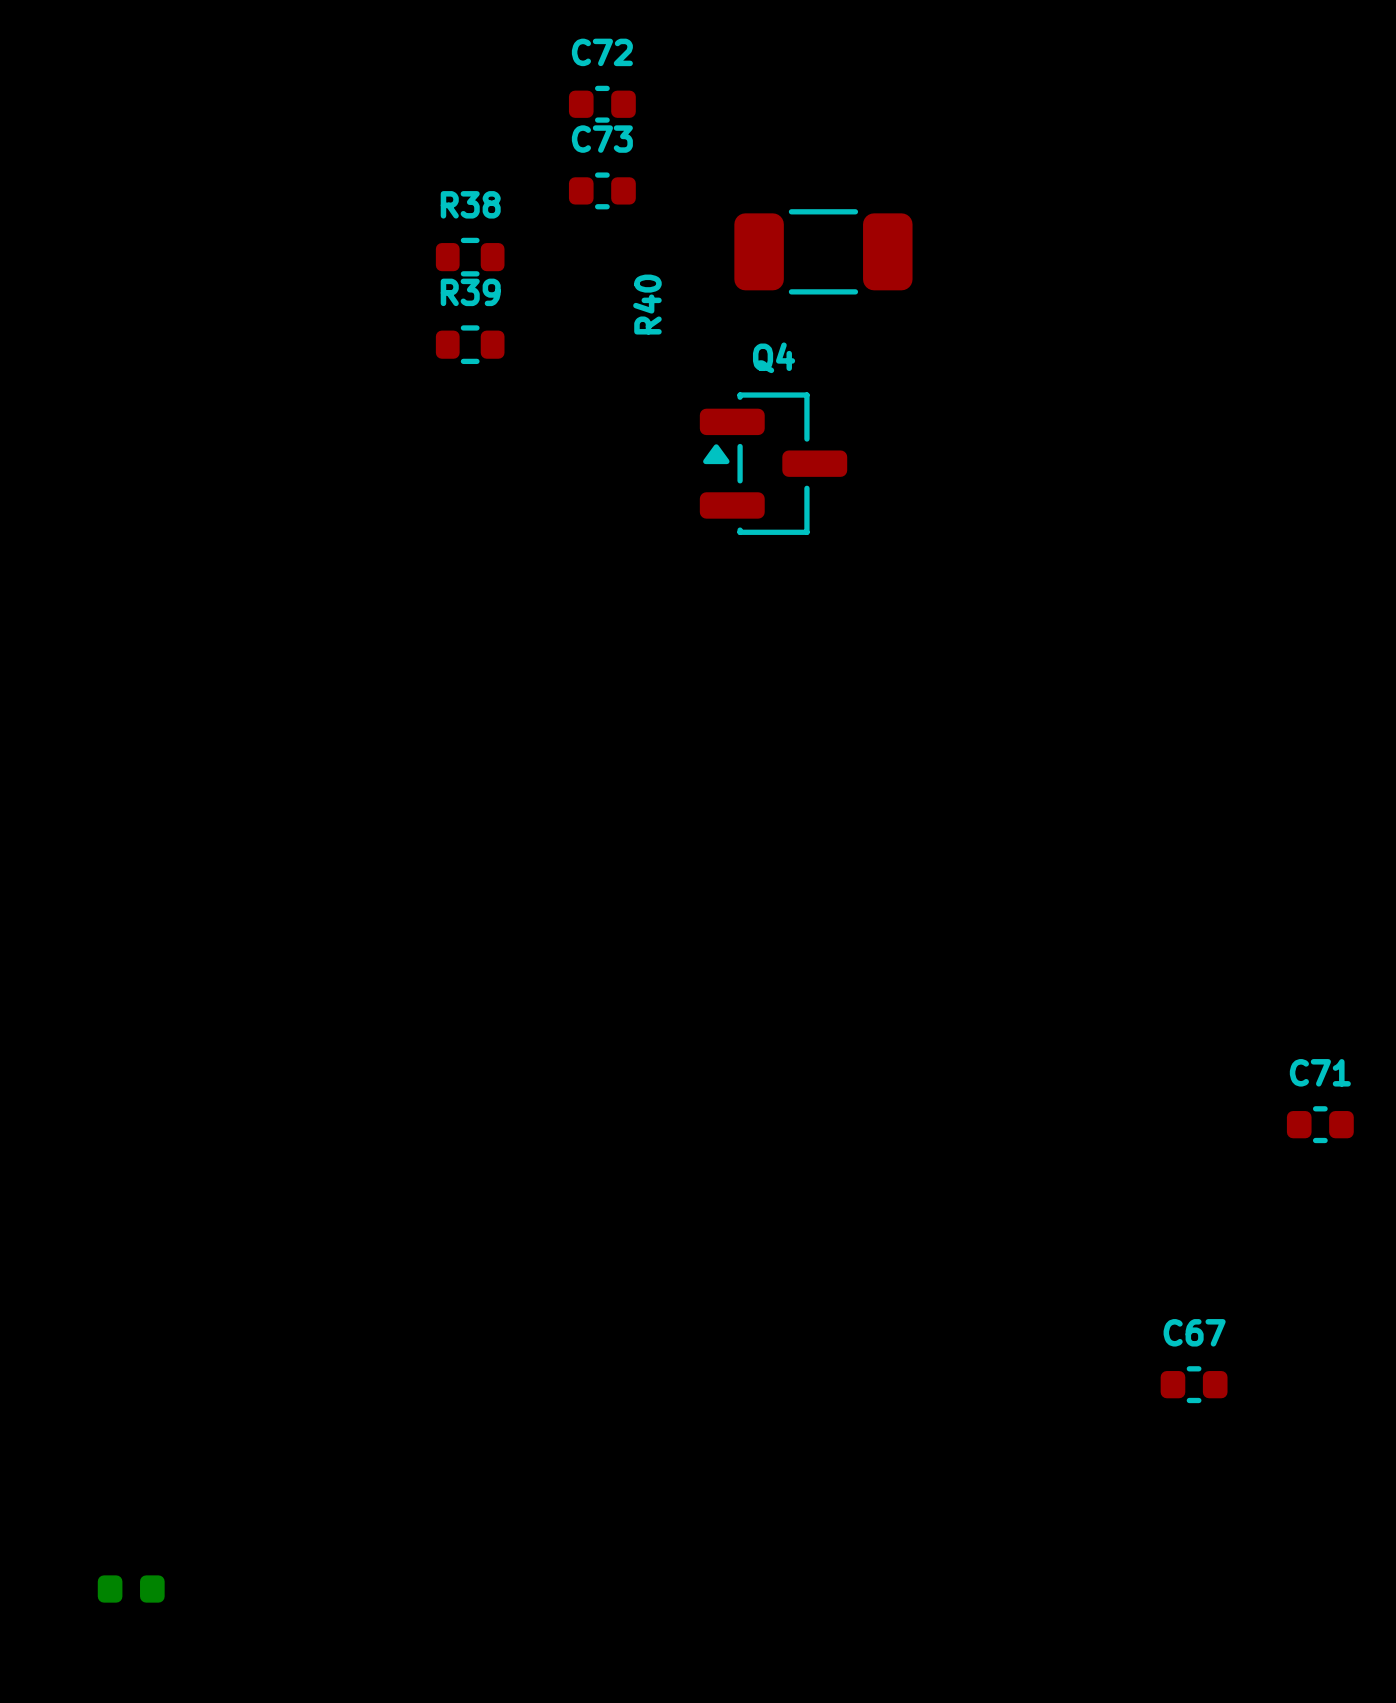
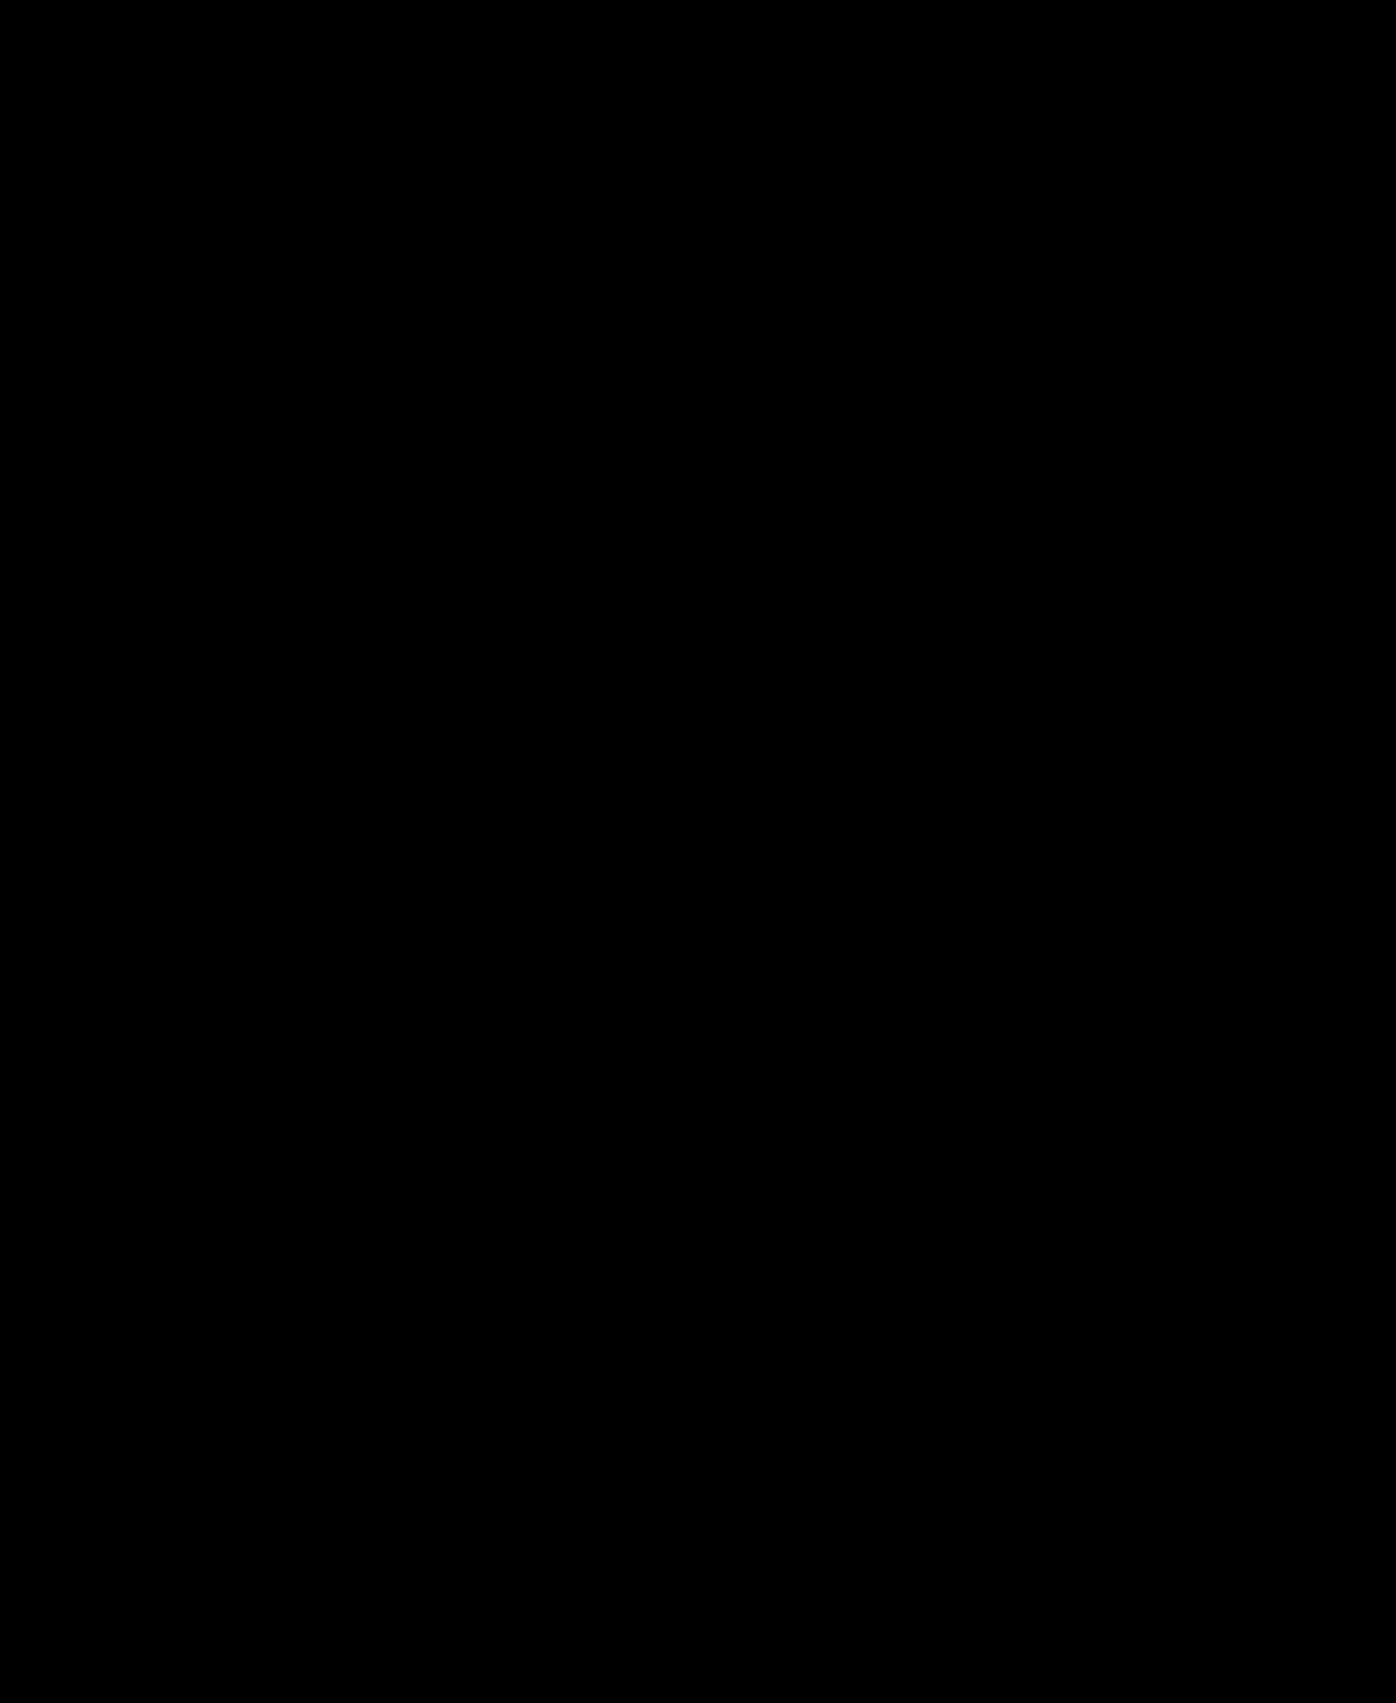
C72: (602, 104) -> none
C73: (602, 190) -> none
R40: (823, 251) -> none
R38: (470, 257) -> none
R39: (470, 344) -> none
Q4: (773, 463) -> none
C71: (1320, 1124) -> none
C67: (1194, 1384) -> none
part: (131, 1589) -> none

